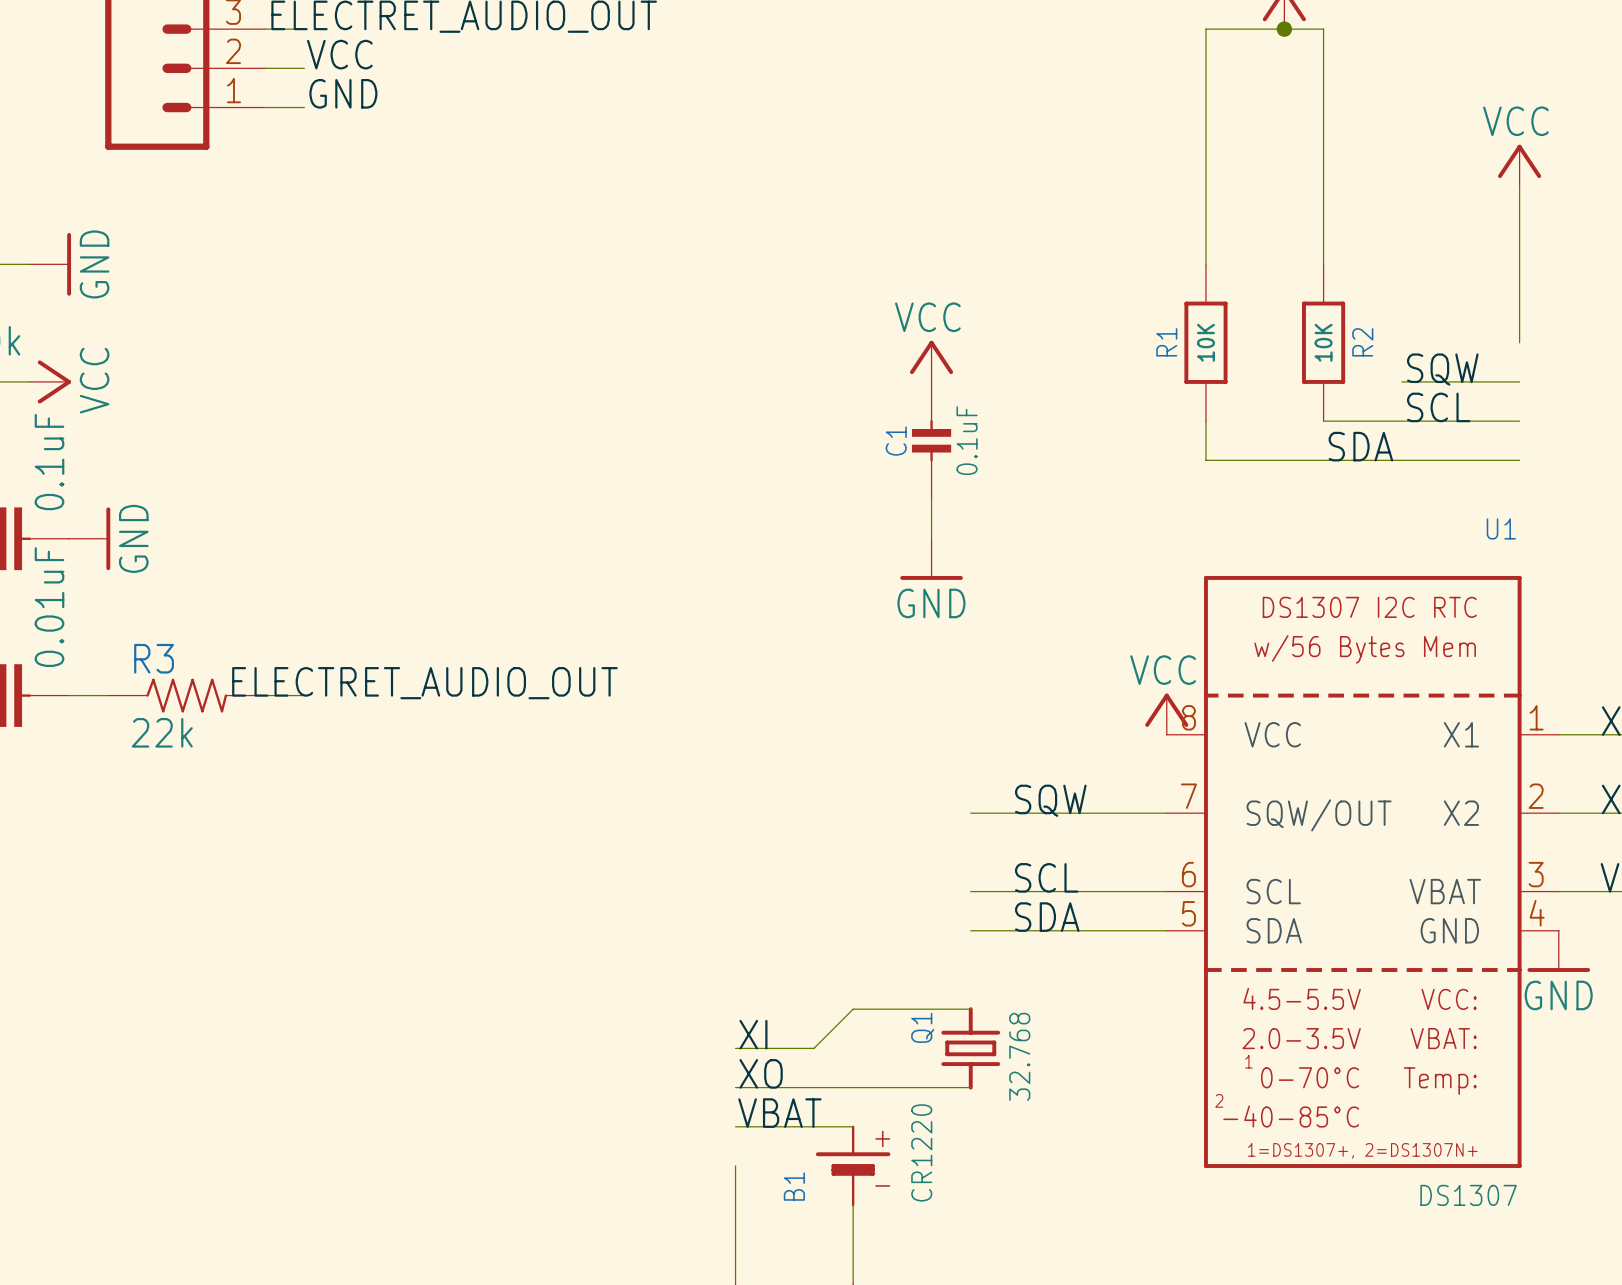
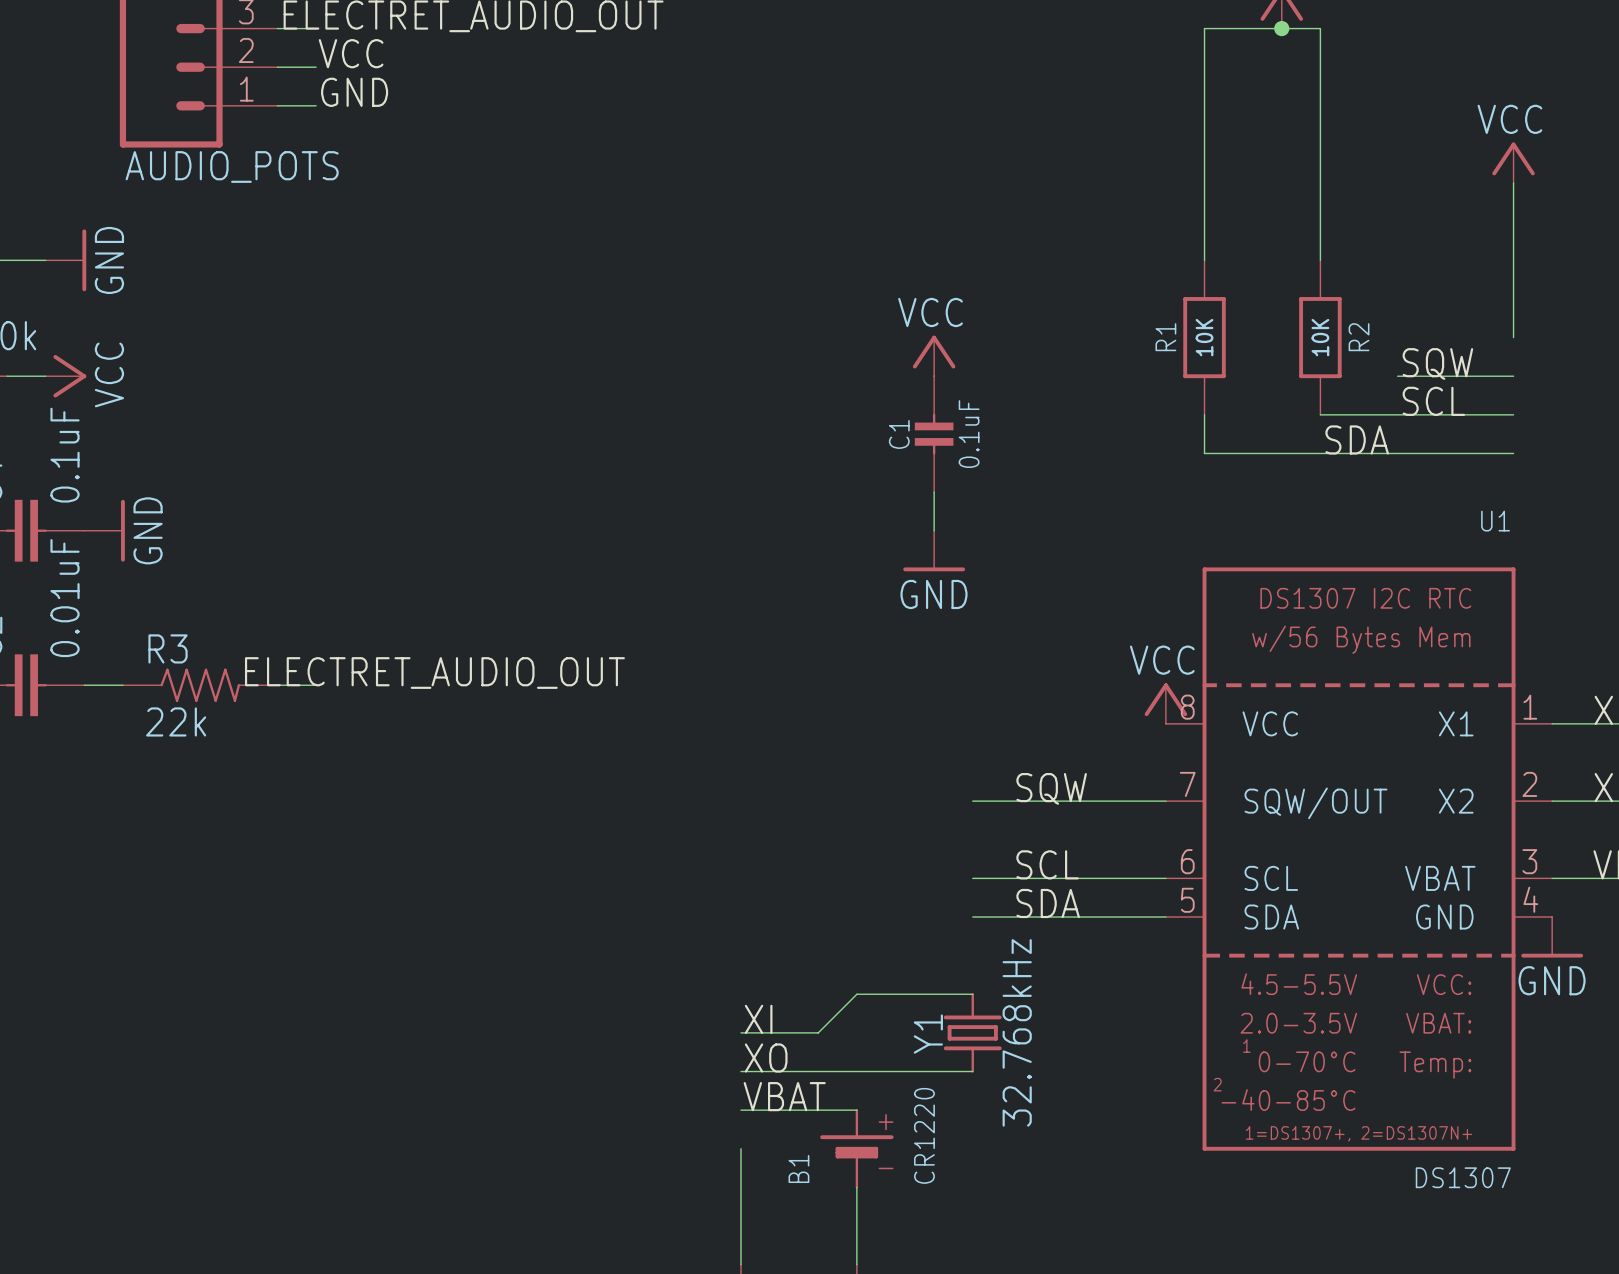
part value: none -> AUDIO_POTS (232, 166)
Q1: 32.768 (970, 1048) -> none
Y1: none -> 32.768kHz (972, 1032)

